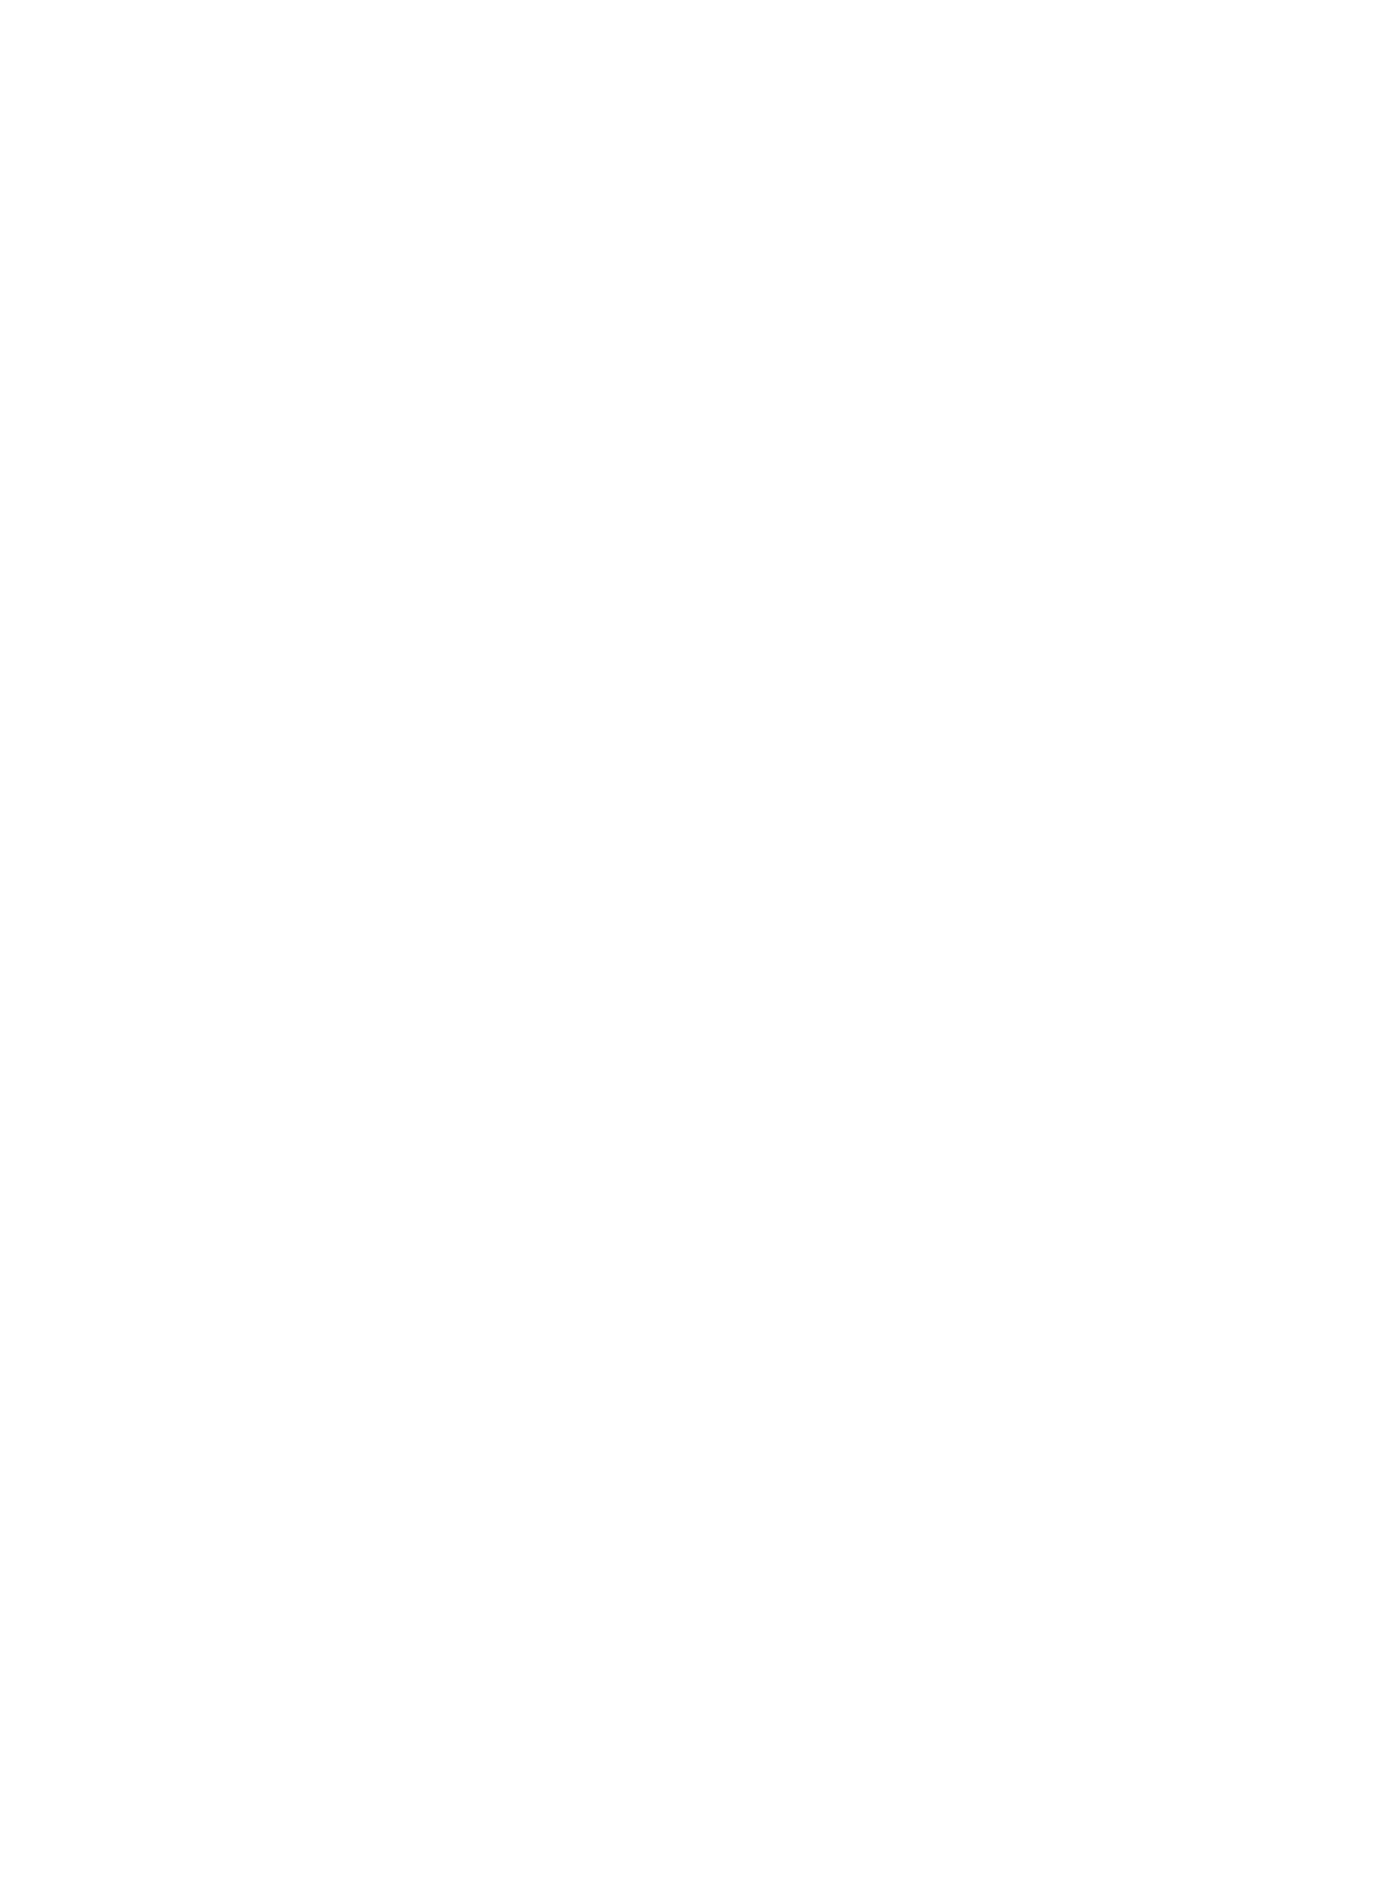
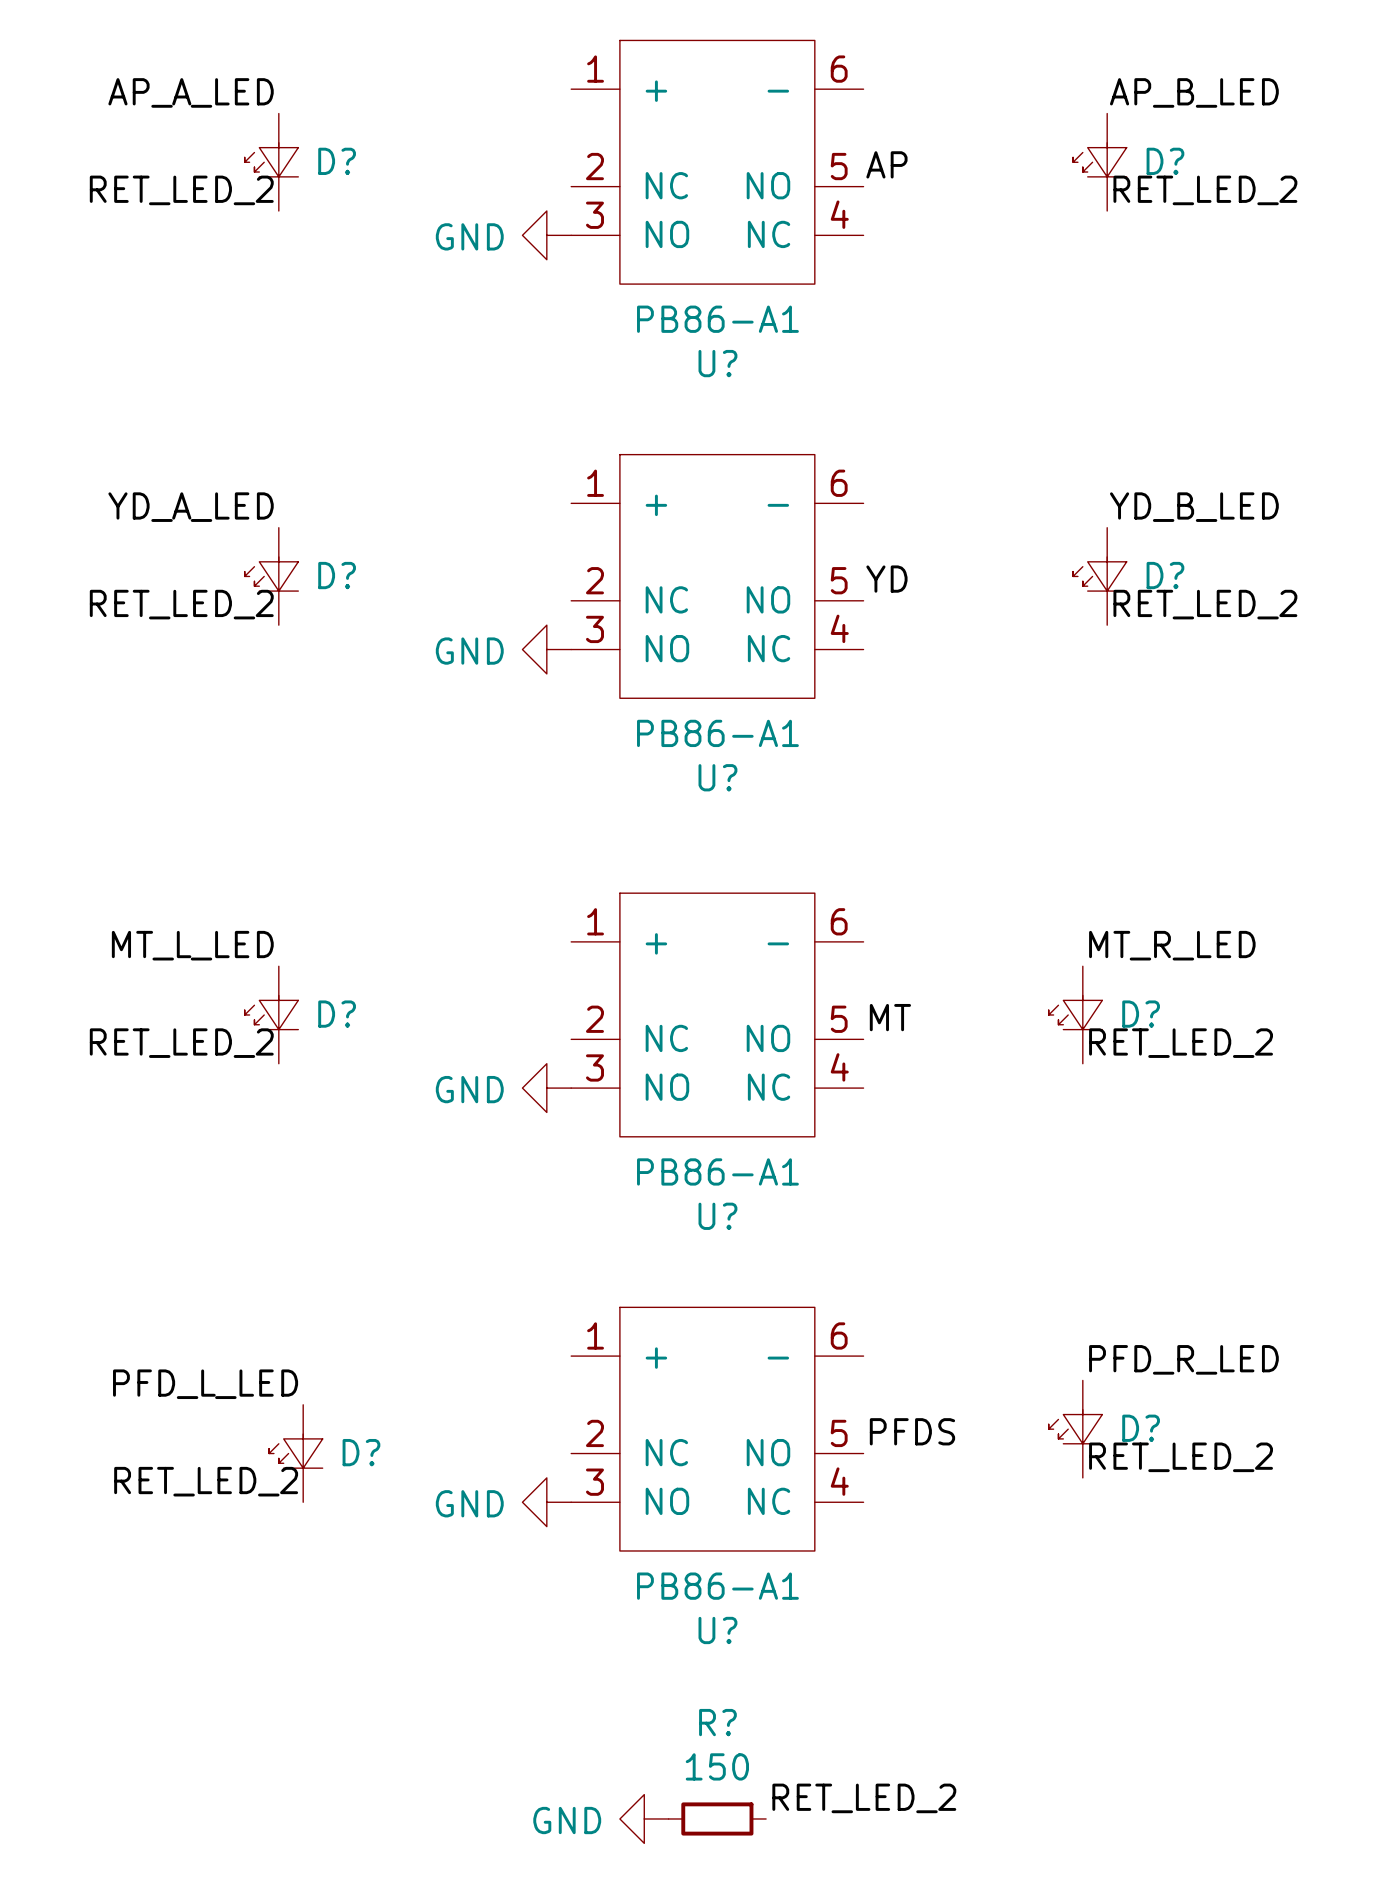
label: none -> AP_A_LED (191, 92)
label: none -> AP_B_LED (1194, 92)
D?: none -> (271, 162)
U?: none -> PB86-A1 (717, 162)
D?: none -> (1099, 162)
label: none -> AP (886, 164)
label: none -> RET_LED_2 (181, 190)
label: none -> RET_LED_2 (1205, 190)
power symbol: none -> GND (546, 235)
label: none -> YD_A_LED (191, 507)
label: none -> YD_B_LED (1194, 507)
D?: none -> (271, 576)
U?: none -> PB86-A1 (717, 576)
D?: none -> (1099, 576)
label: none -> YD (886, 579)
label: none -> RET_LED_2 (181, 604)
label: none -> RET_LED_2 (1205, 604)
power symbol: none -> GND (546, 649)
label: none -> MT_L_LED (192, 945)
label: none -> MT_R_LED (1172, 945)
D?: none -> (271, 1014)
U?: none -> PB86-A1 (717, 1014)
D?: none -> (1075, 1014)
label: none -> MT (890, 1017)
label: none -> RET_LED_2 (181, 1043)
label: none -> RET_LED_2 (1181, 1043)
power symbol: none -> GND (546, 1088)
label: none -> PFD_R_LED (1183, 1359)
label: none -> PFD_L_LED (205, 1384)
U?: none -> PB86-A1 (717, 1429)
D?: none -> (1075, 1429)
label: none -> PFDS (912, 1431)
D?: none -> (295, 1453)
label: none -> RET_LED_2 (1181, 1457)
label: none -> RET_LED_2 (206, 1481)
power symbol: none -> GND (546, 1502)
label: none -> RET_LED_2 (864, 1798)
power symbol: none -> GND (644, 1818)
R?: none -> 150 (717, 1818)

